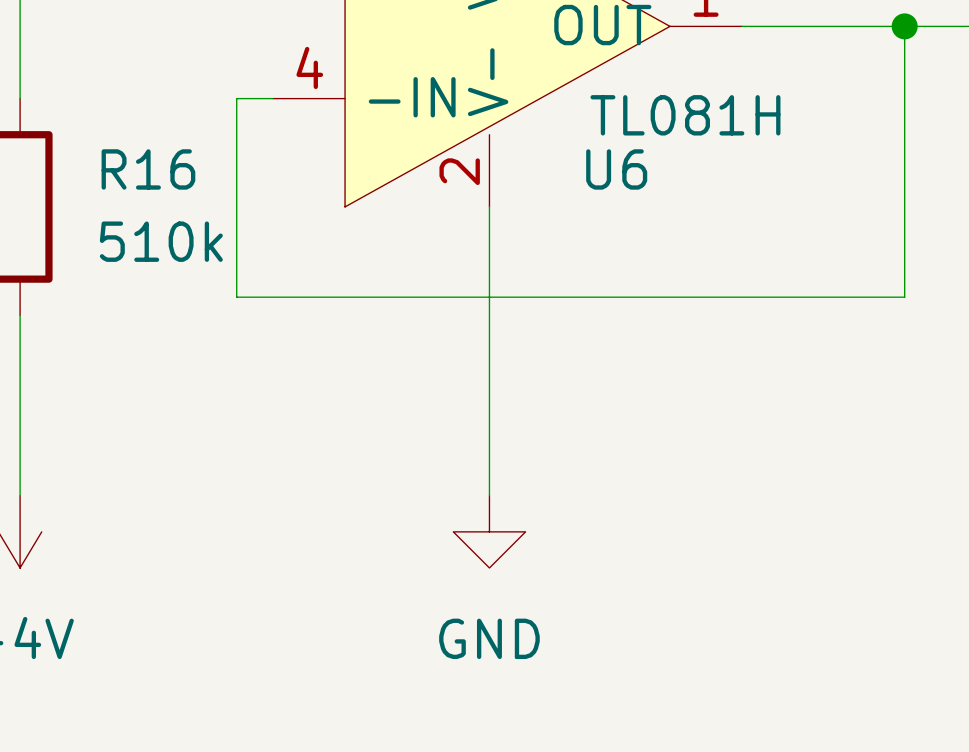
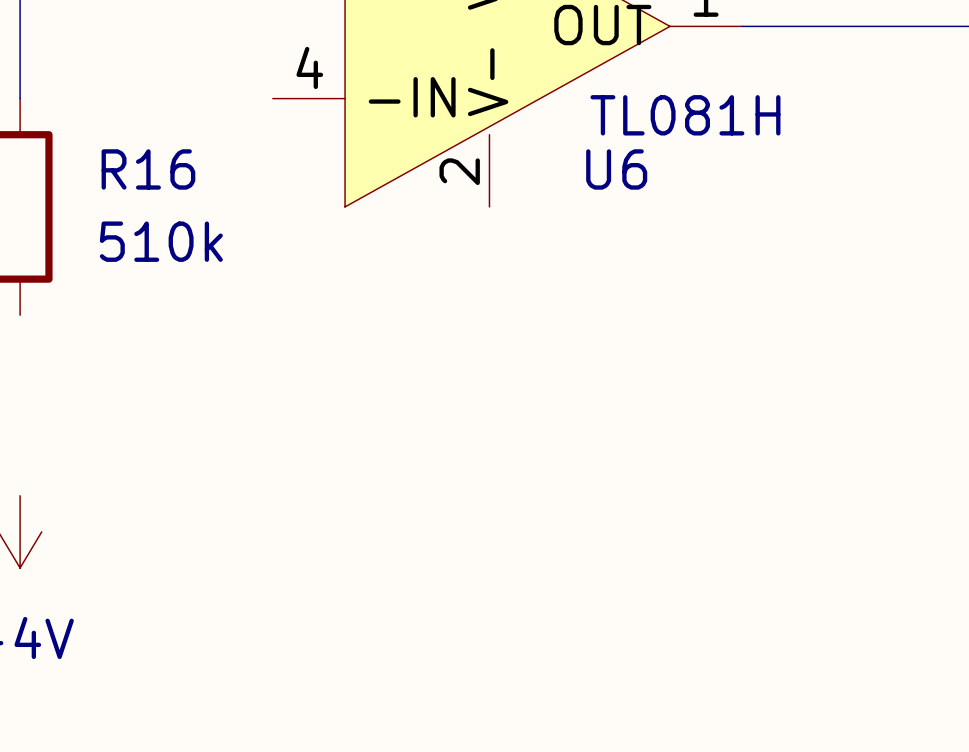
wire: (904, 26) (904, 297) (236, 297) (236, 98) (272, 98) -> none
junction: (904, 26) -> none
wire: (489, 206) (489, 495) -> none
wire: (20, 315) (20, 495) -> none
power symbol: GND (489, 531) -> none

